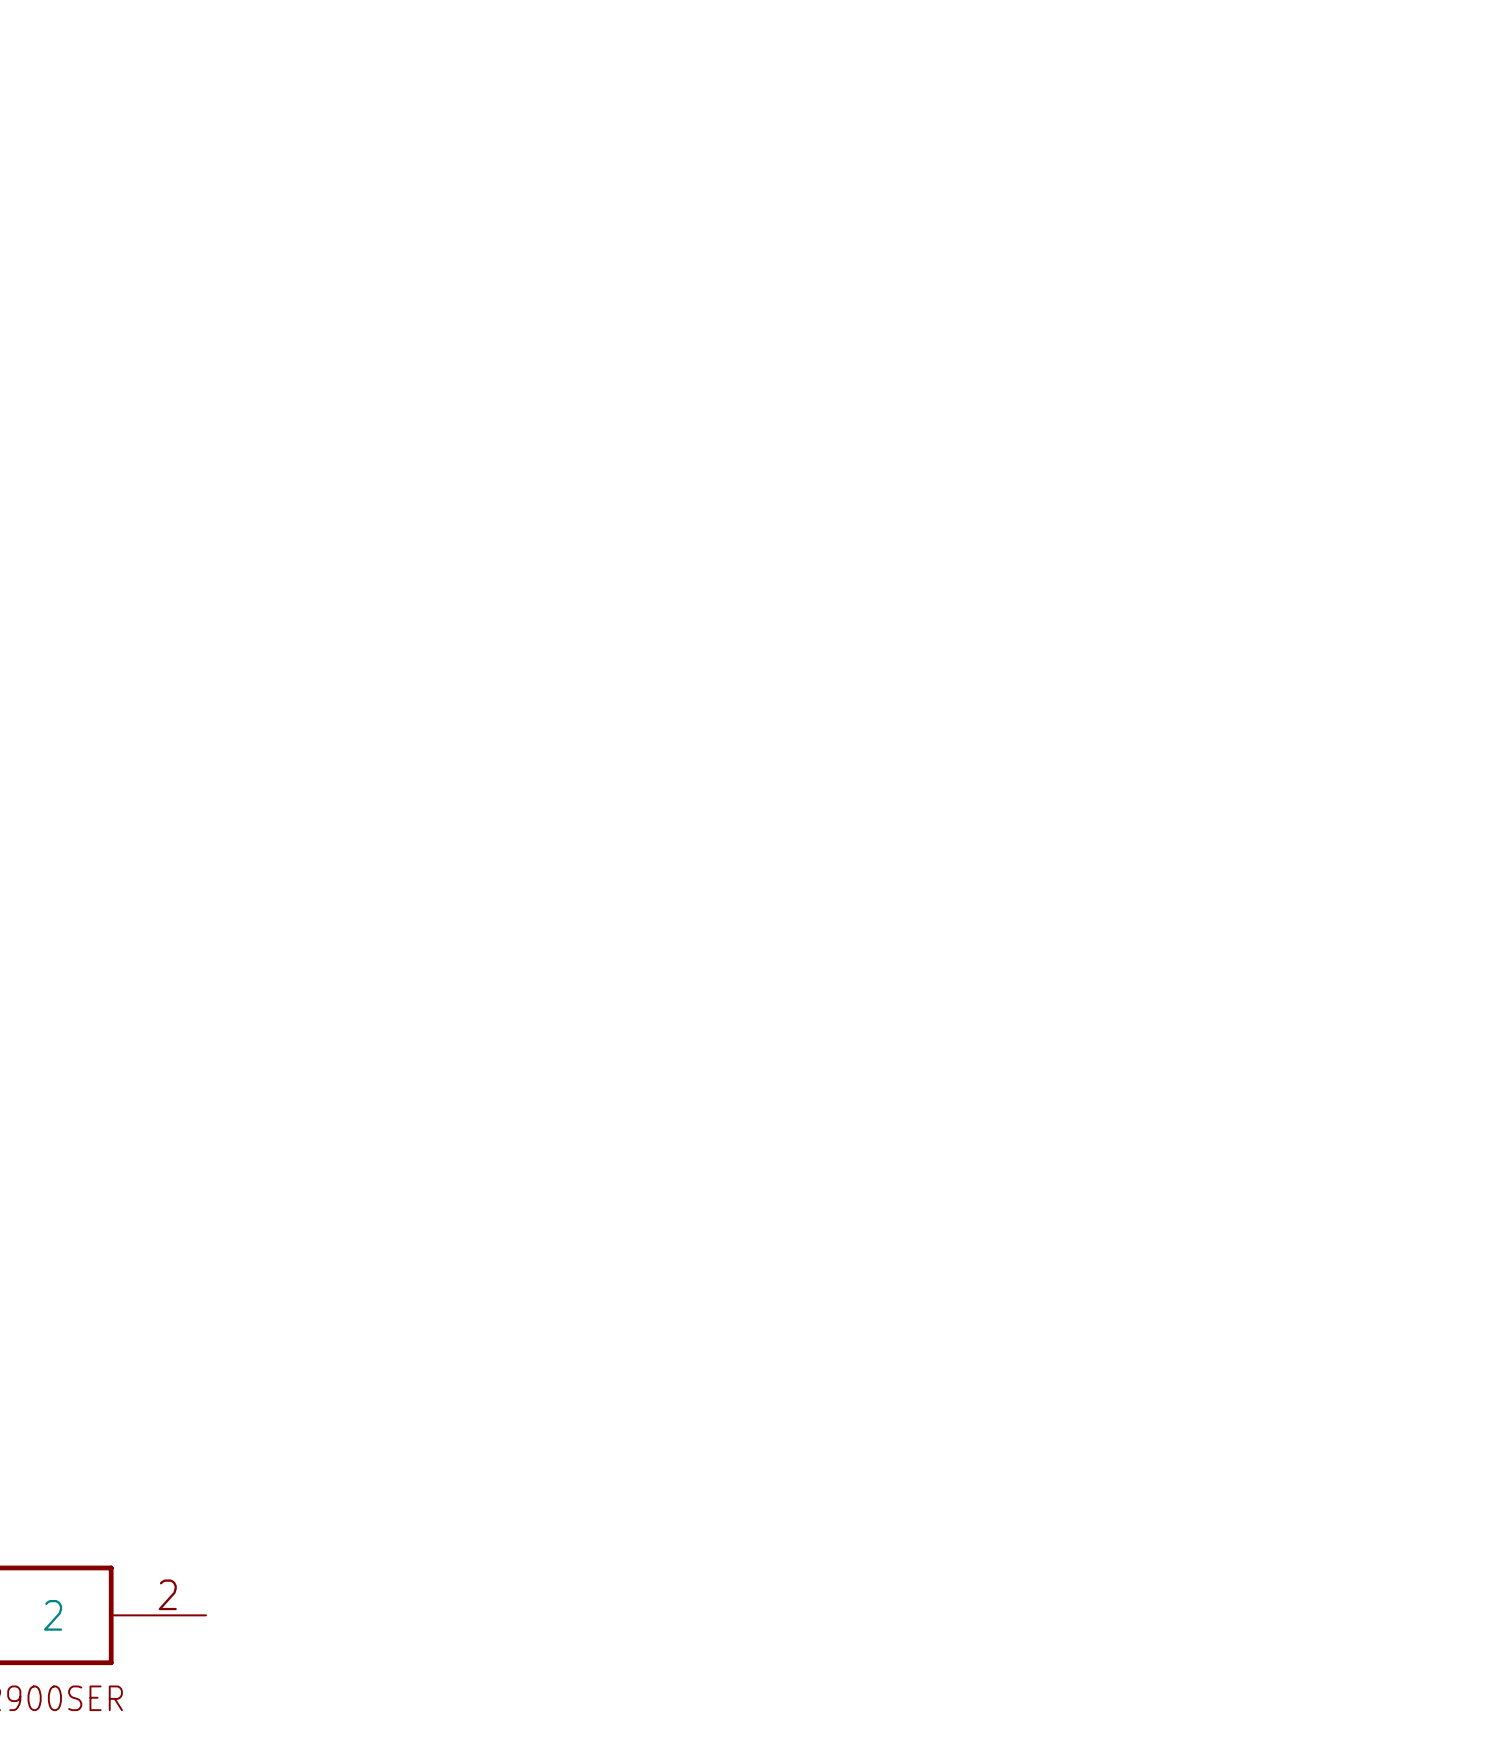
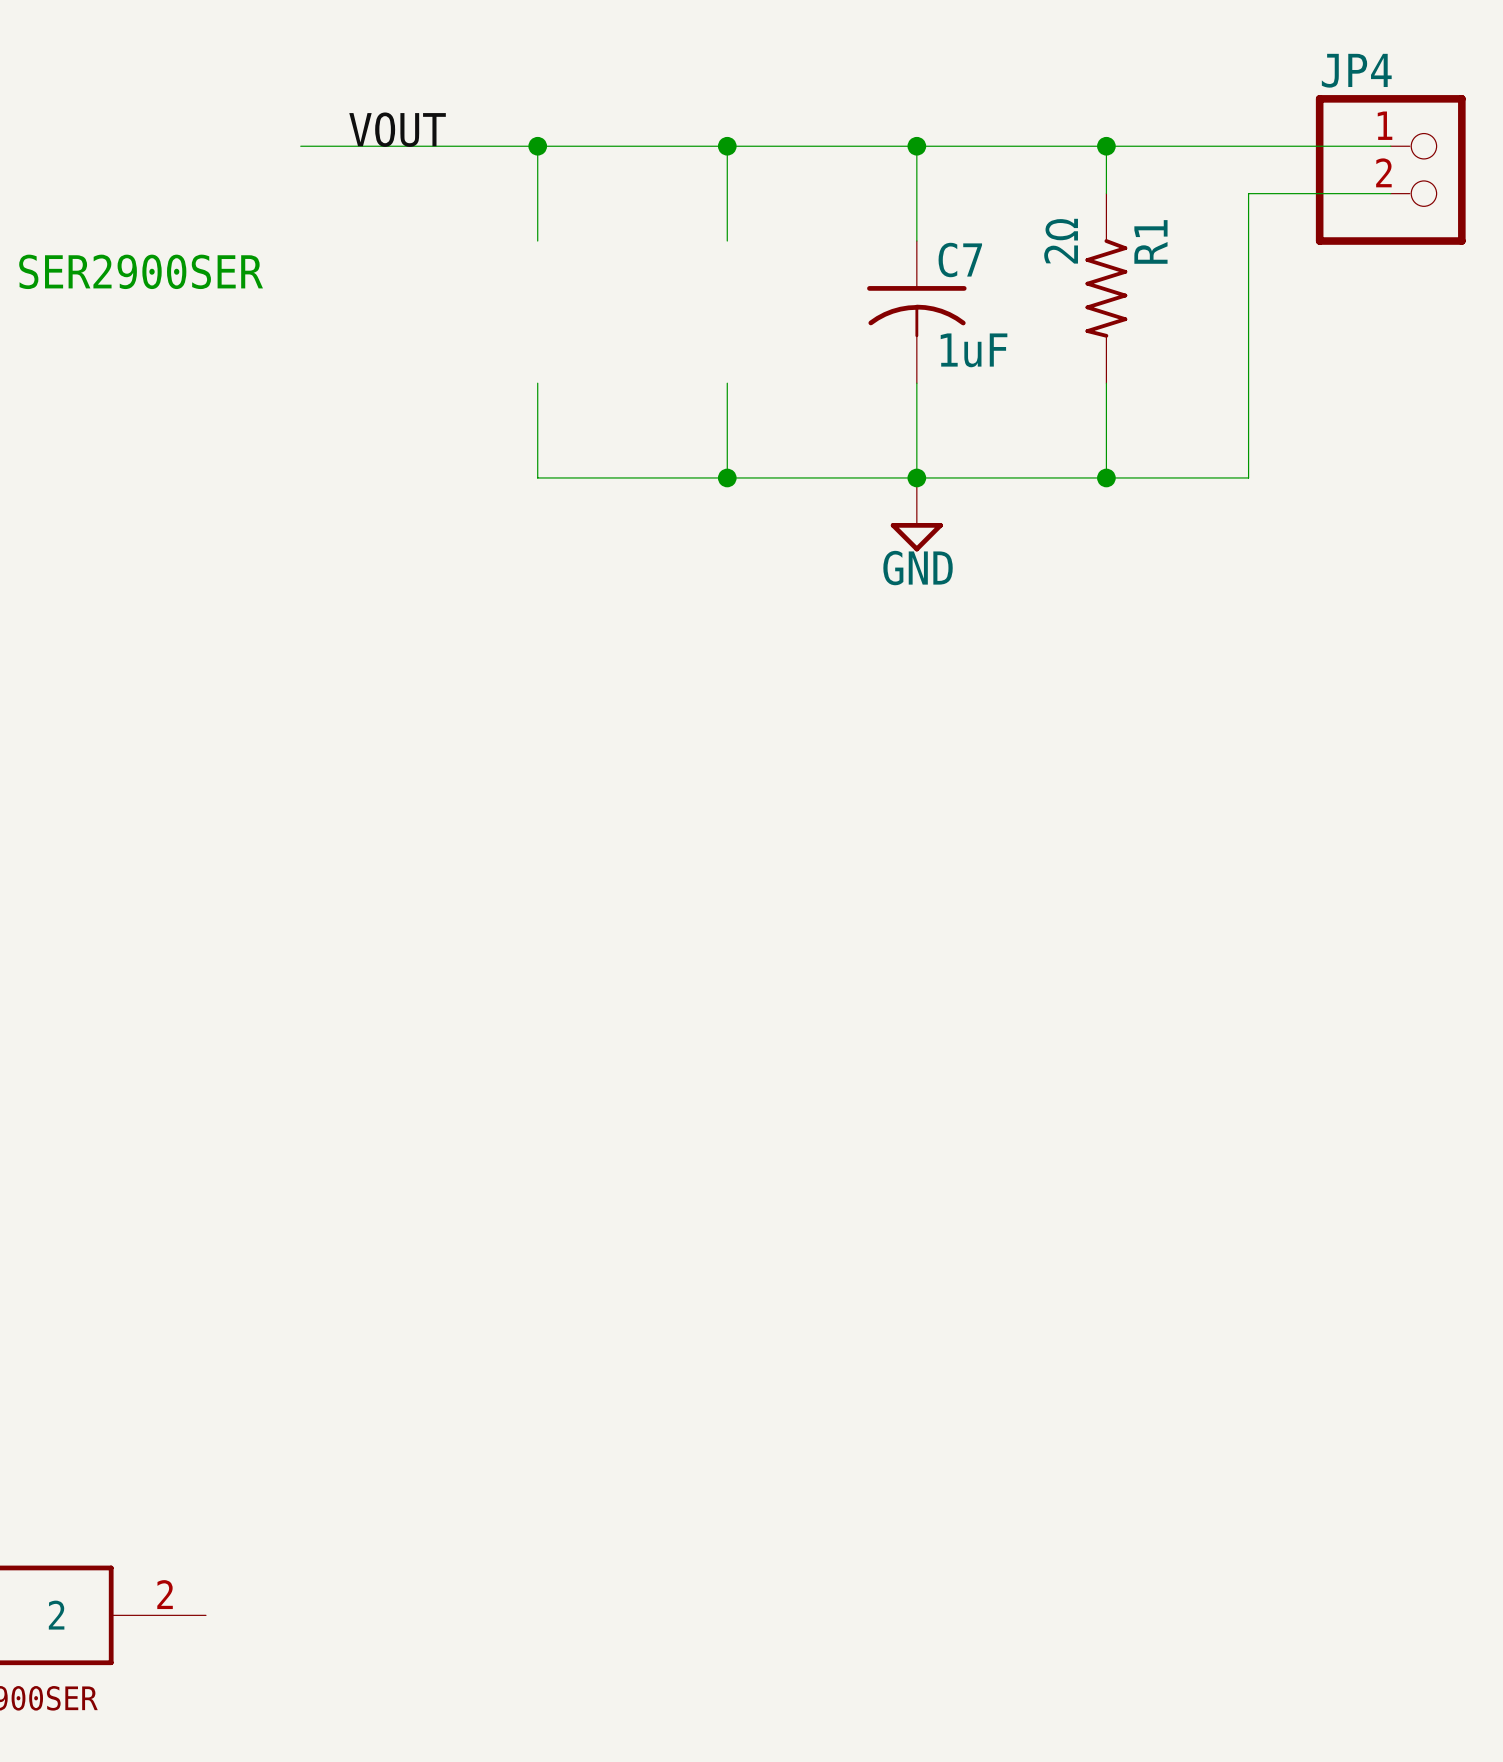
label: none -> VOUT (397, 129)
wire: none -> (300, 146) (1390, 146)
wire: none -> (537, 146) (537, 241)
junction: none -> (537, 146)
wire: none -> (727, 146) (727, 241)
junction: none -> (727, 146)
wire: none -> (916, 146) (916, 241)
junction: none -> (916, 146)
wire: none -> (1106, 146) (1106, 193)
junction: none -> (1106, 146)
JP4: none -> (1390, 169)
wire: none -> (1390, 193) (1248, 193) (1248, 477) (537, 477) (537, 383)
text: none -> SER2900SER (141, 271)
R1: none -> 2Ω (1106, 288)
C7: none -> 1uF (916, 312)
wire: none -> (727, 383) (727, 477)
wire: none -> (916, 383) (916, 477)
wire: none -> (1106, 383) (1106, 477)
junction: none -> (727, 477)
junction: none -> (916, 477)
junction: none -> (1106, 477)
power symbol: none -> GND (916, 514)

